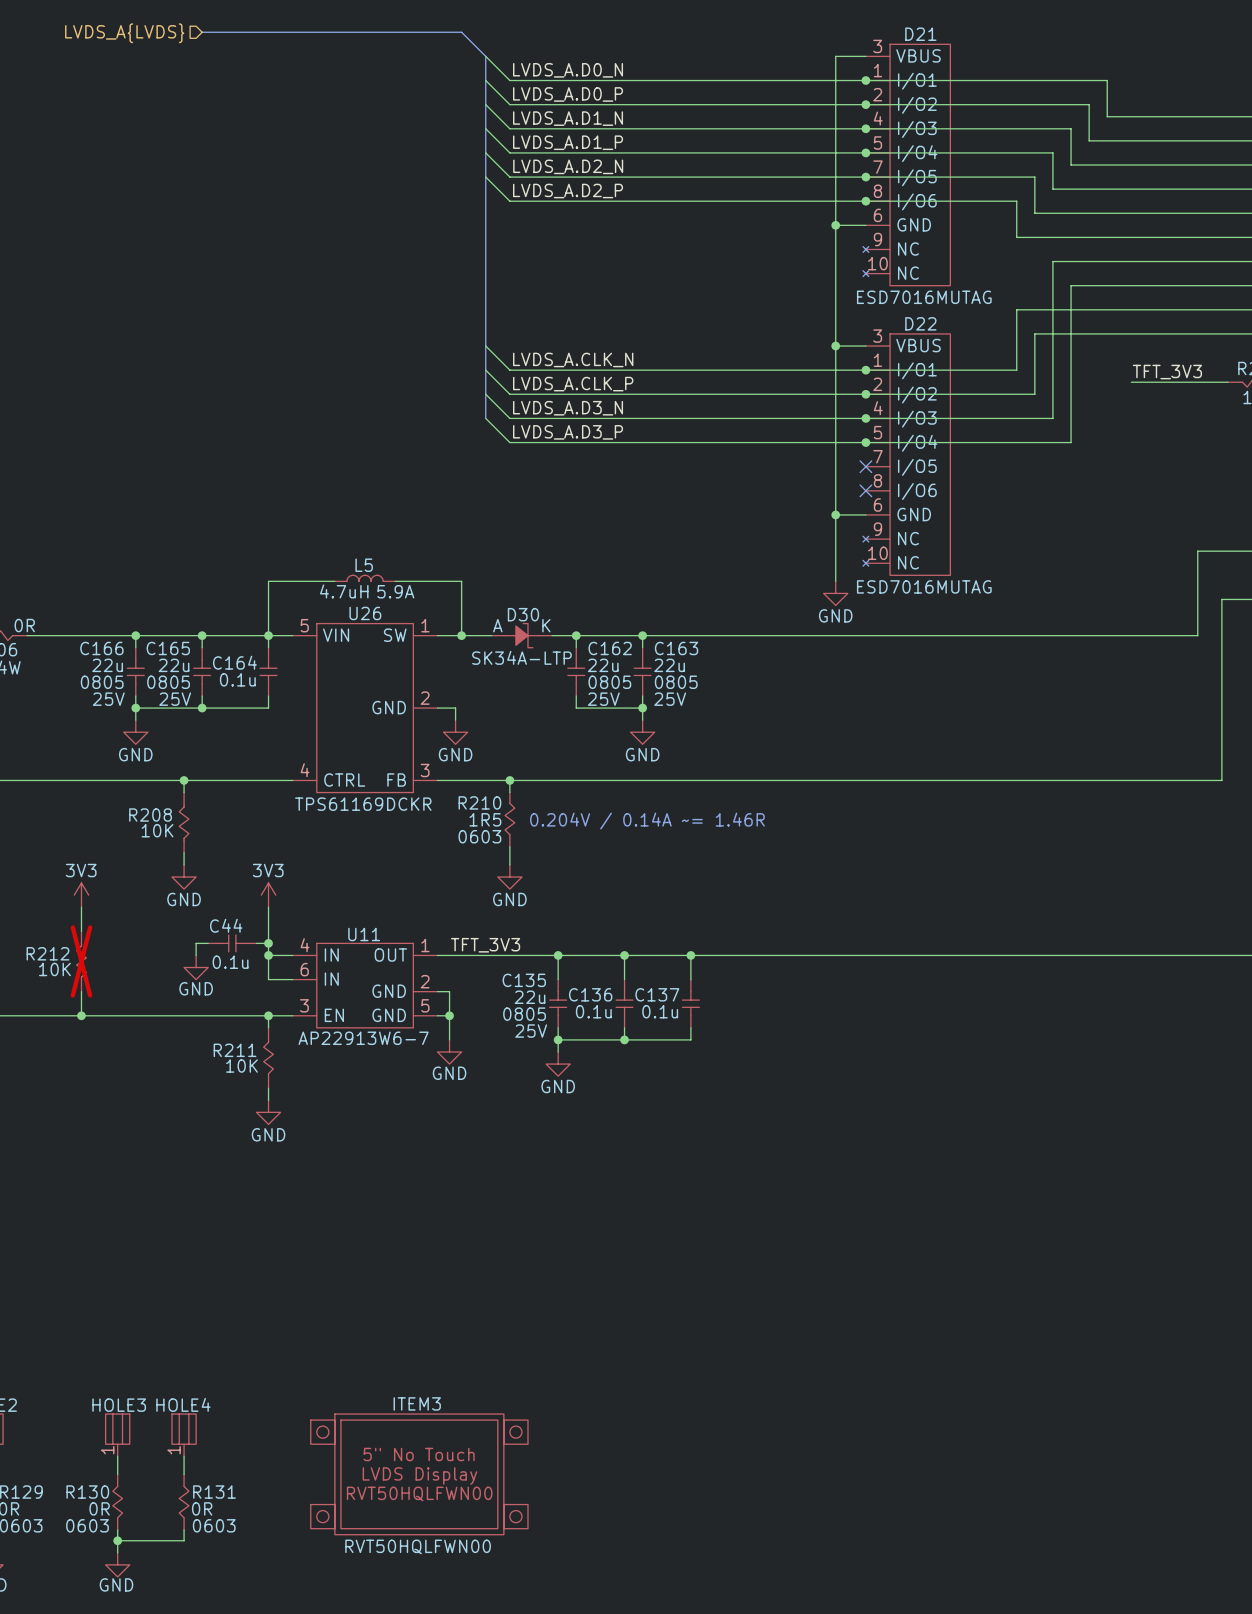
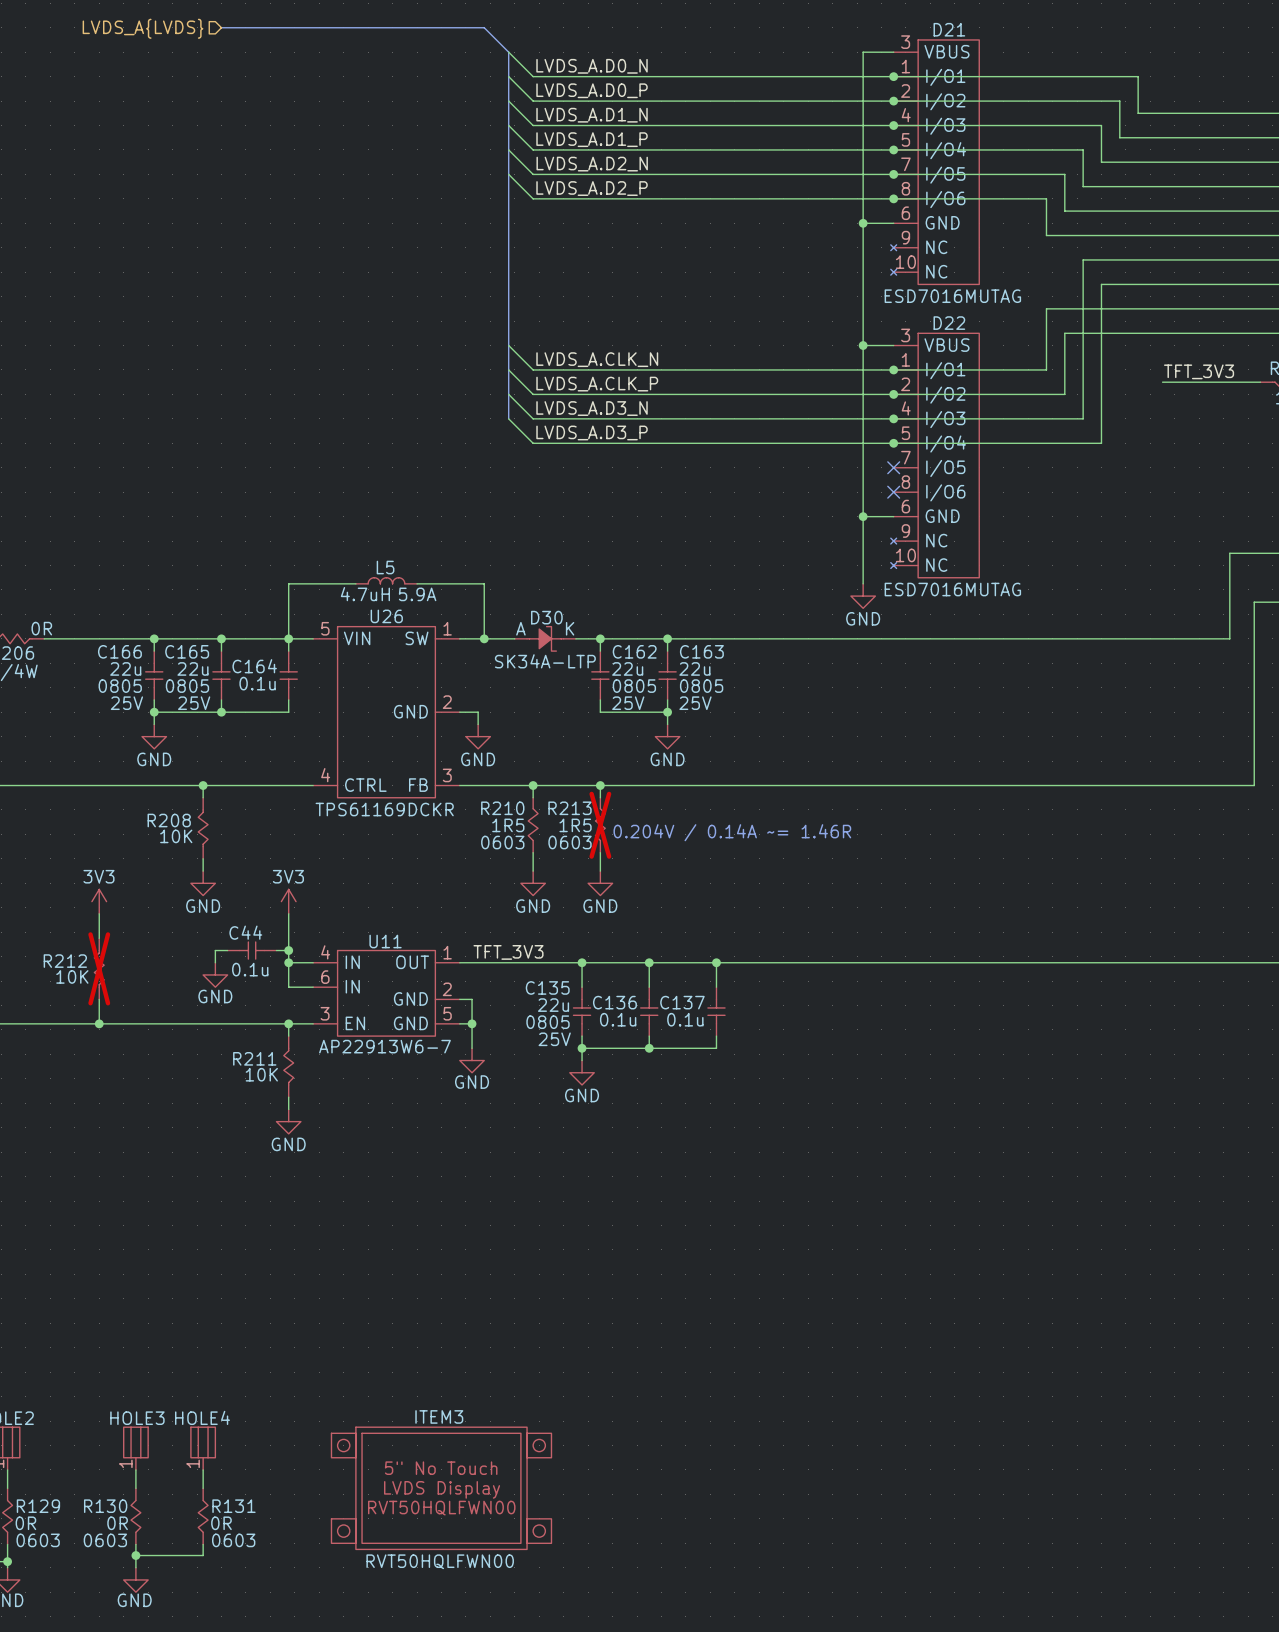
wire: none -> (600, 785) (600, 797)
junction: none -> (600, 785)
R213: none -> 1R5 (600, 825)
text position: 0.204V / 0.14A ~= 1.46R (647, 821) -> 0.204V / 0.14A ~= 1.46R (732, 832)
wire: none -> (600, 852) (600, 871)
power symbol: none -> GND (600, 883)

